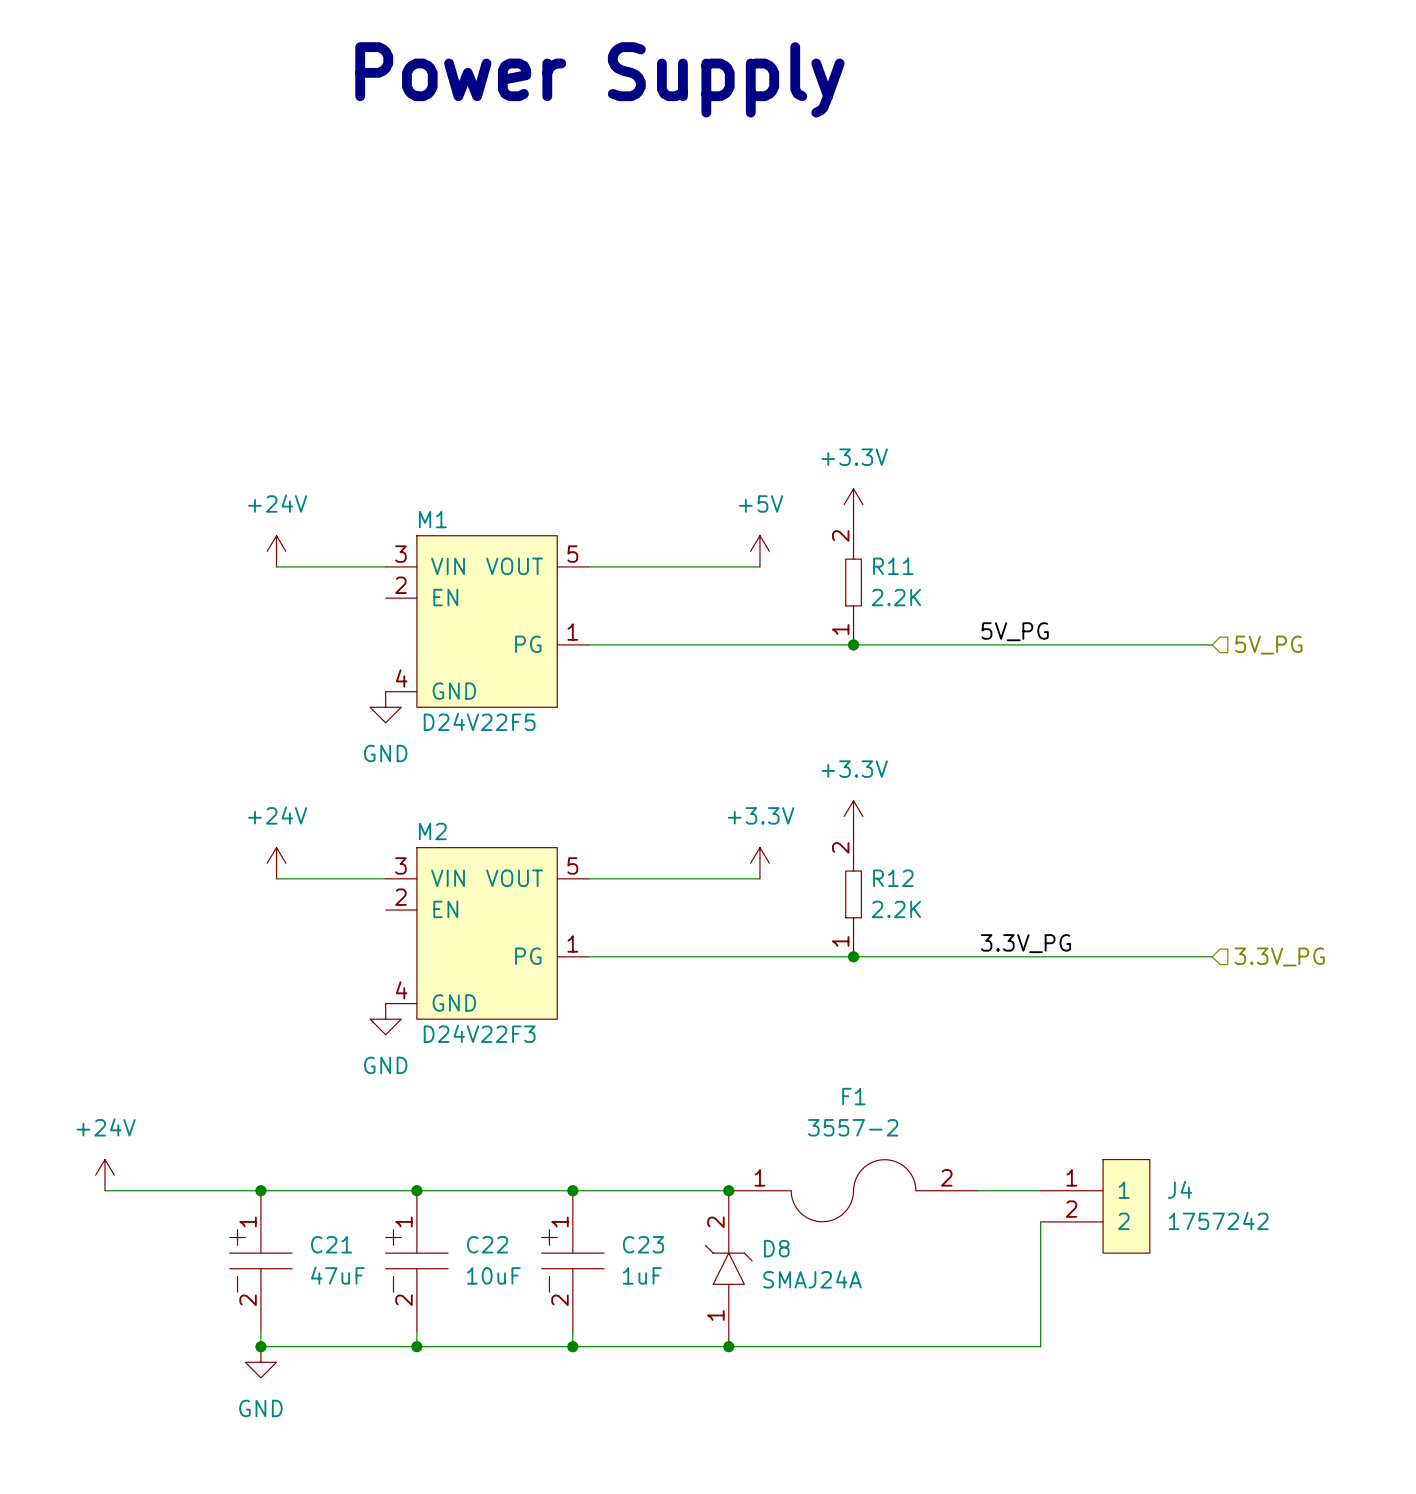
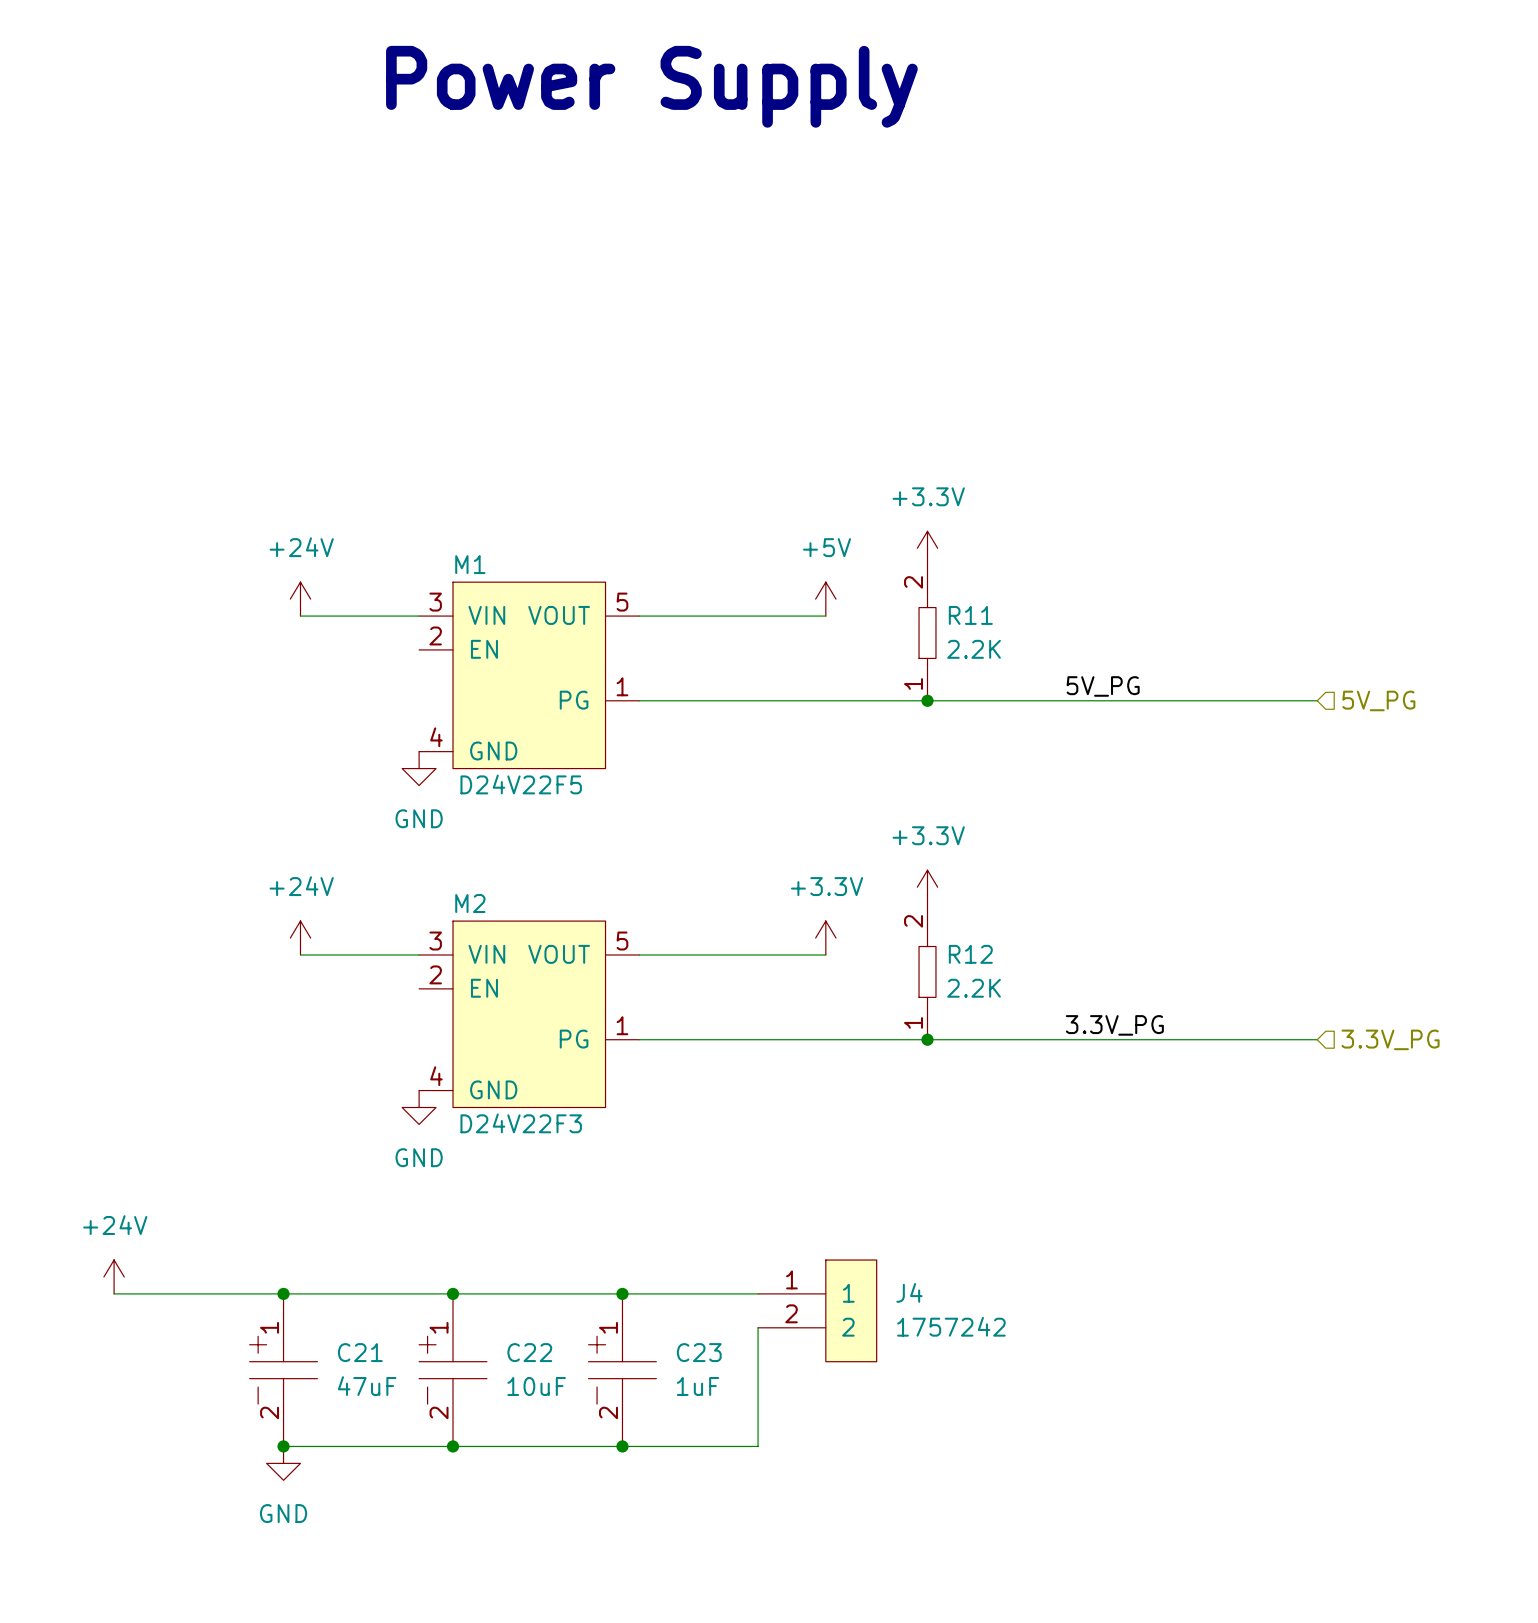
junction: (728, 1190) -> none
F1: (853, 1190) -> none
wire: (978, 1190) (1040, 1190) -> none
J4 position: (1095, 1206) -> (817, 1310)
wire: (1040, 1221) (1040, 1346) (260, 1346) (260, 1331) -> (758, 1327) (758, 1446) (283, 1446)
D8: (728, 1268) -> none
wire: (416, 1331) (416, 1346) -> none
wire: (572, 1331) (572, 1346) -> none
junction position: (260, 1346) -> (283, 1446)
junction position: (416, 1346) -> (453, 1446)
junction position: (572, 1346) -> (622, 1446)
junction: (728, 1346) -> none
power symbol position: GND (260, 1362) -> GND (283, 1463)

